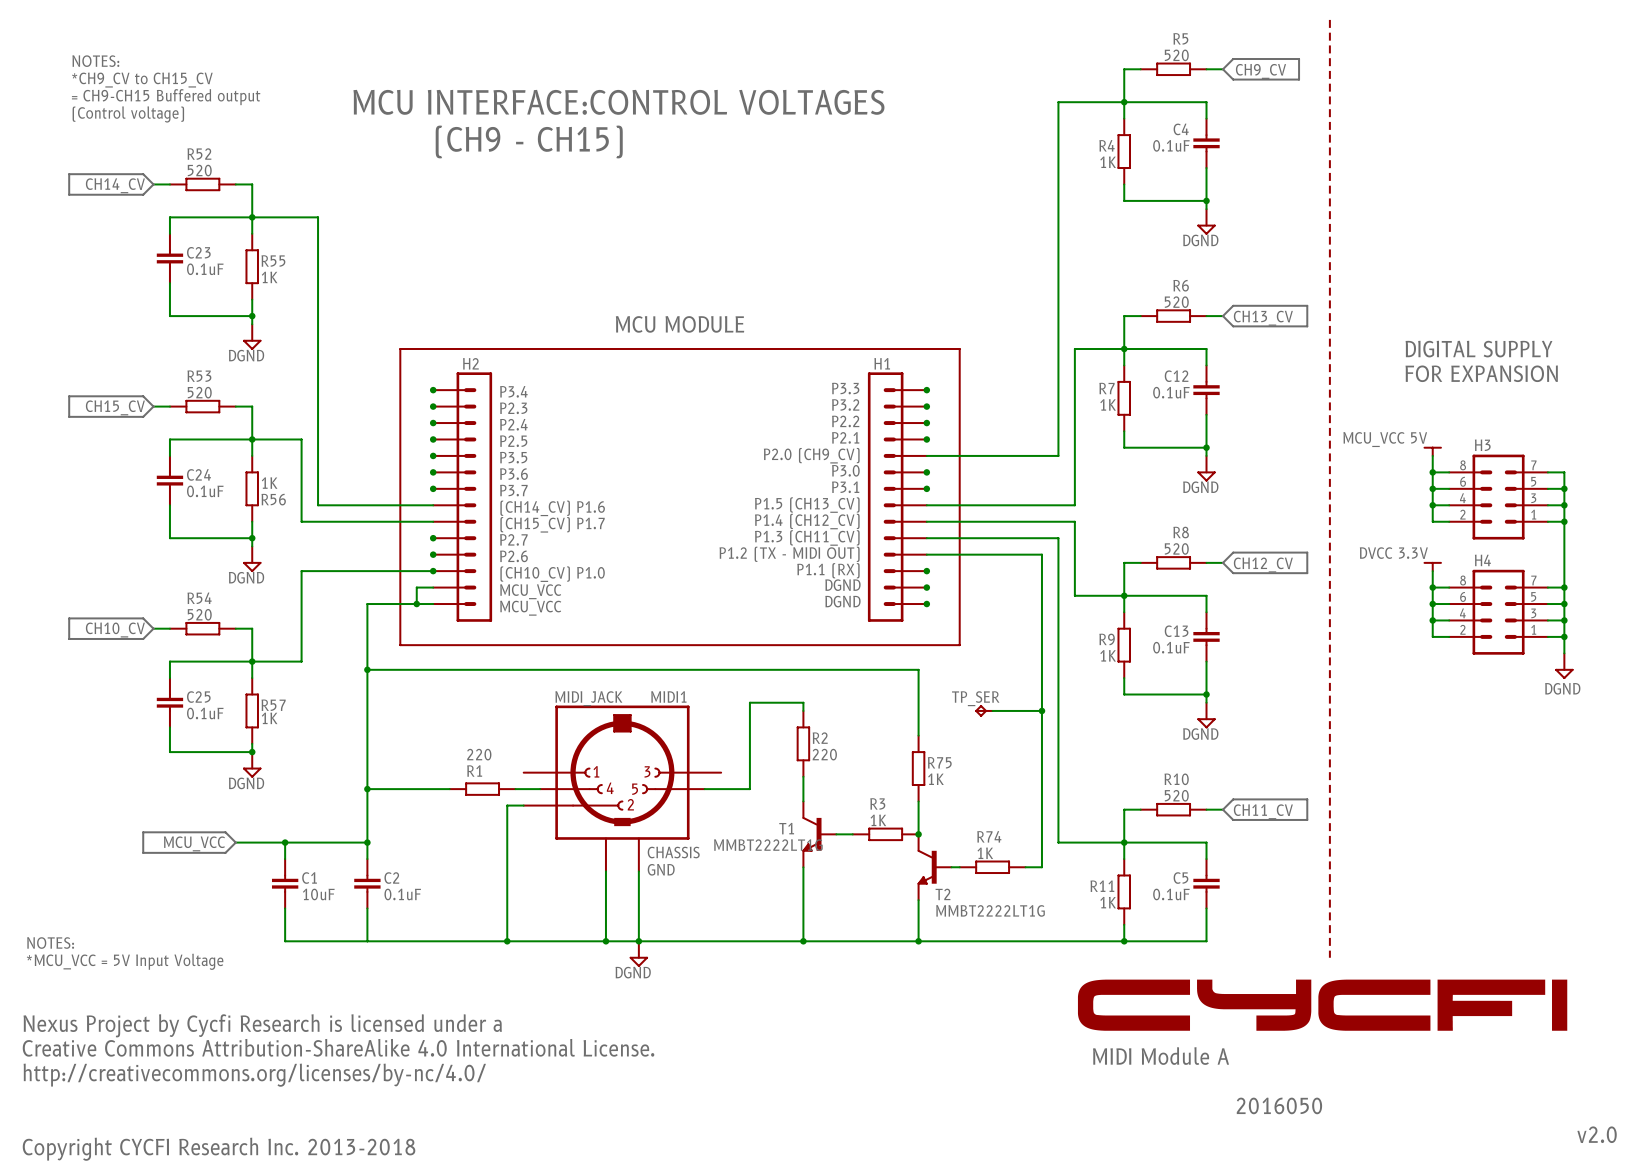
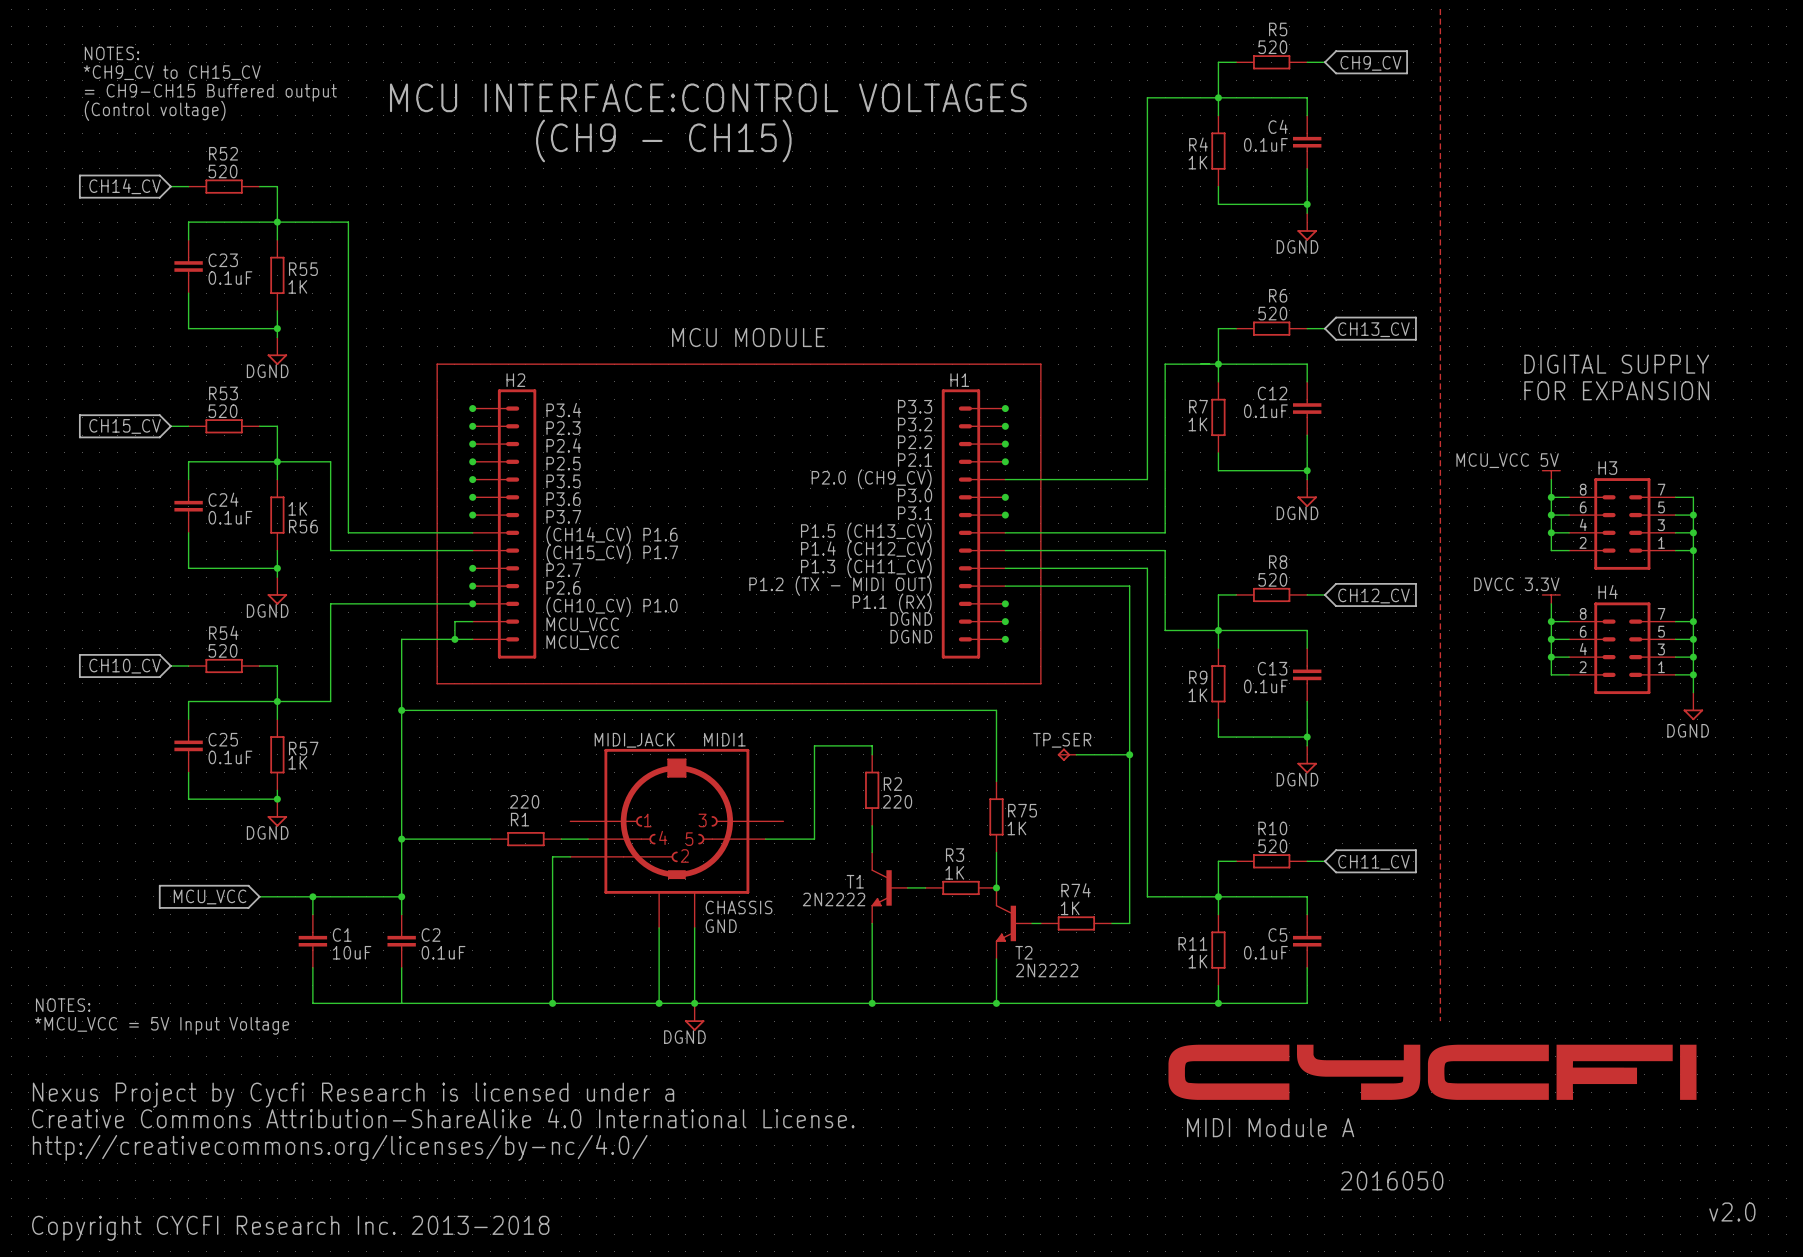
T1 value: MMBT2222LT1G (768, 845) -> 2N2222 (834, 899)
T2 value: MMBT2222LT1G (990, 910) -> 2N2222 (1047, 970)

